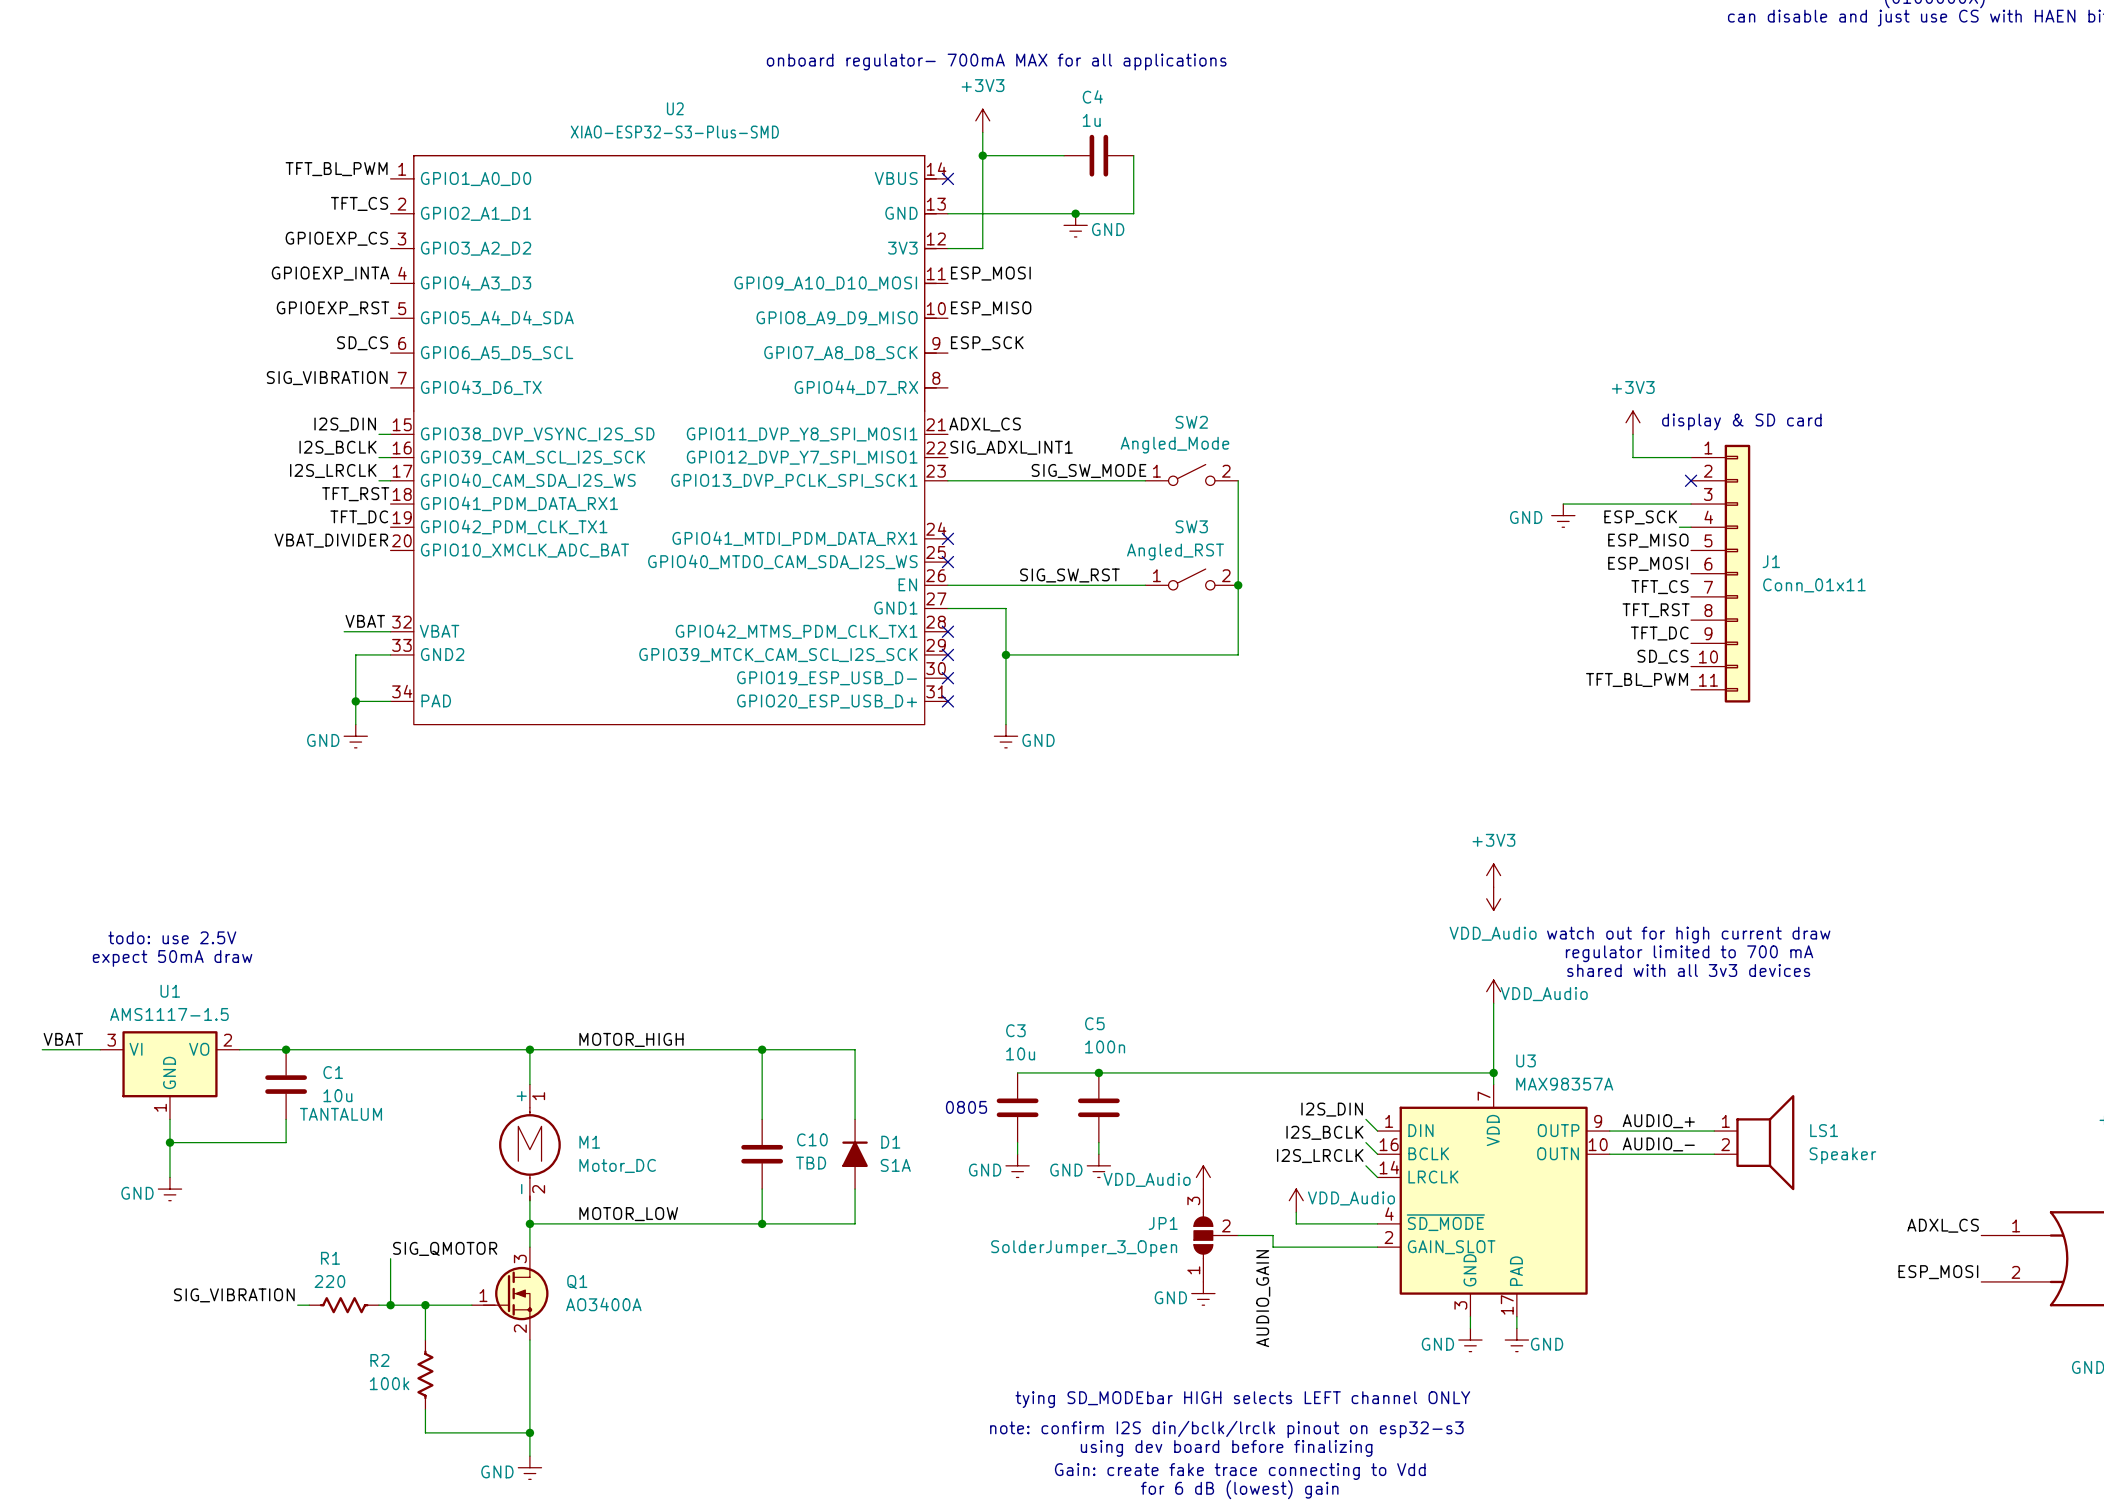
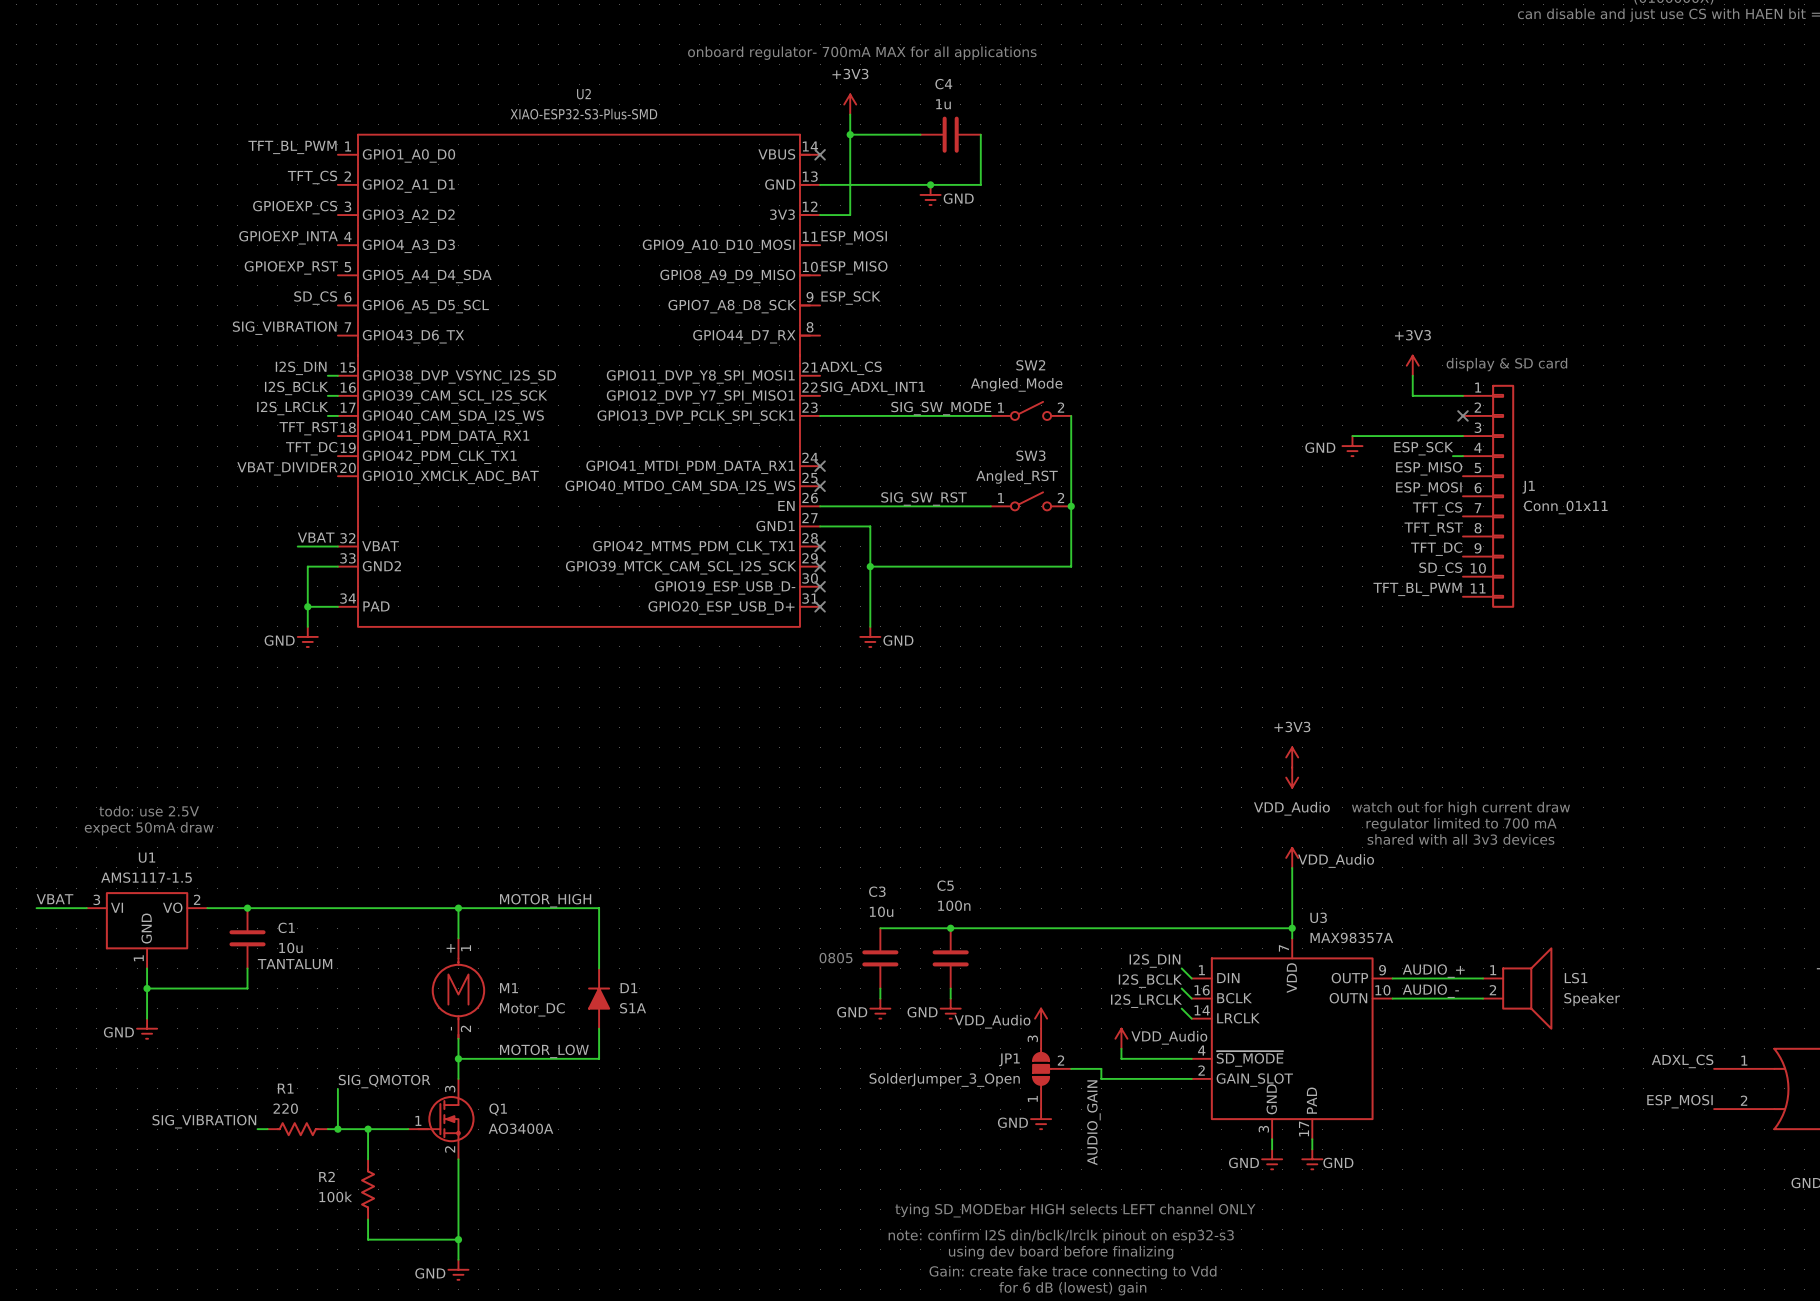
wire: (692, 1049) (855, 1049) (855, 1119) -> (599, 908) (599, 968)
wire: (762, 1049) (762, 1119) -> none
junction: (762, 1049) -> none
C10: TBD (762, 1154) -> none
D1 position: (855, 1154) -> (599, 998)
wire: (762, 1189) (762, 1223) -> none
wire: (855, 1189) (855, 1223) (692, 1223) -> (599, 1028) (599, 1058)
junction: (762, 1223) -> none

